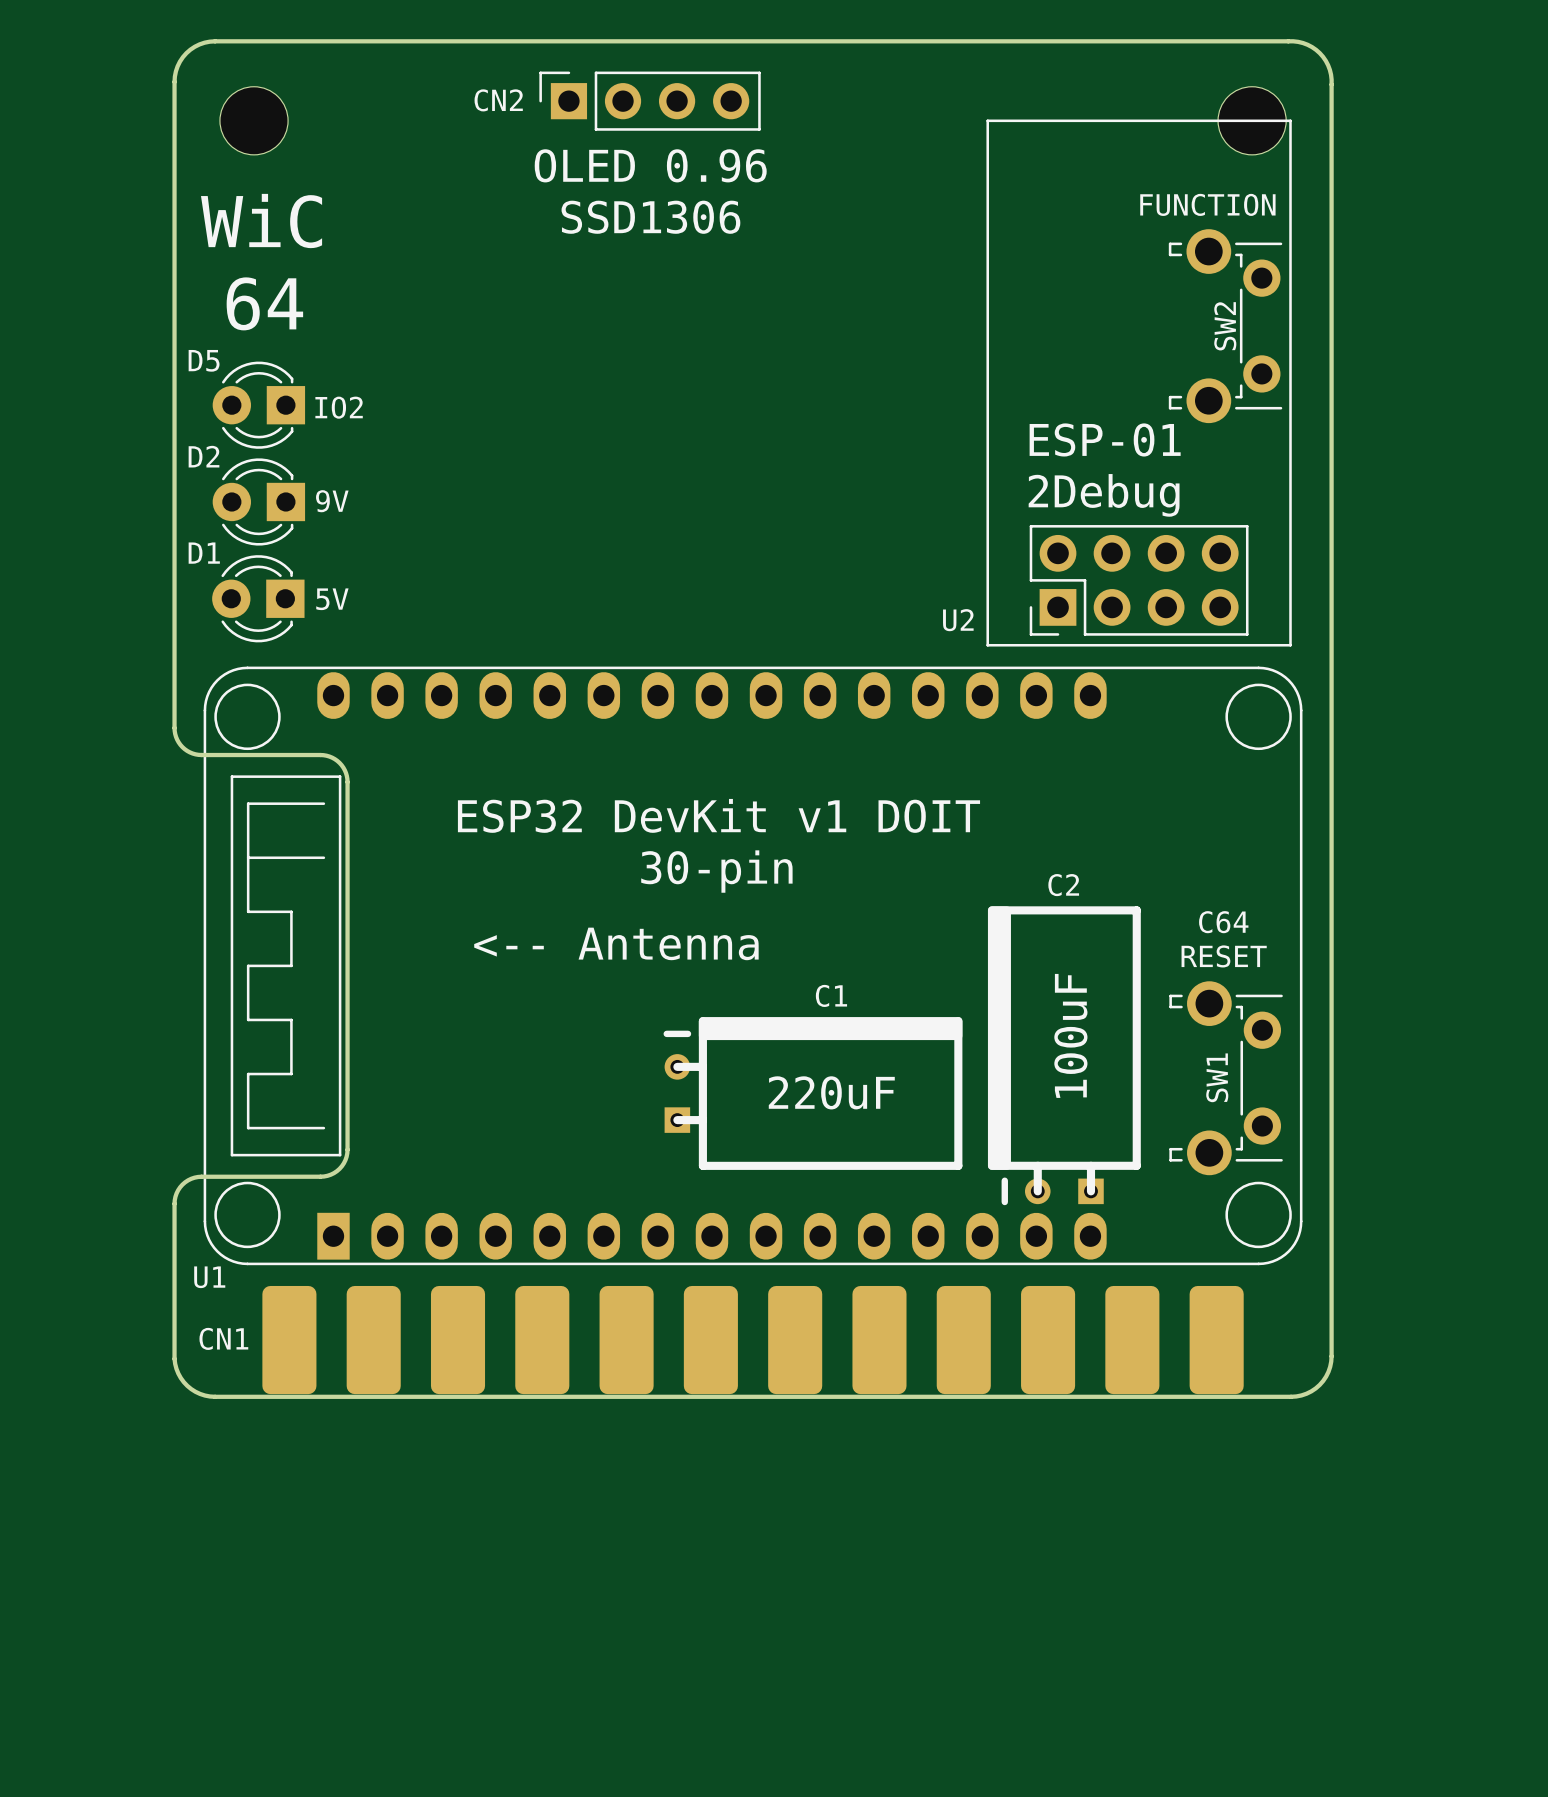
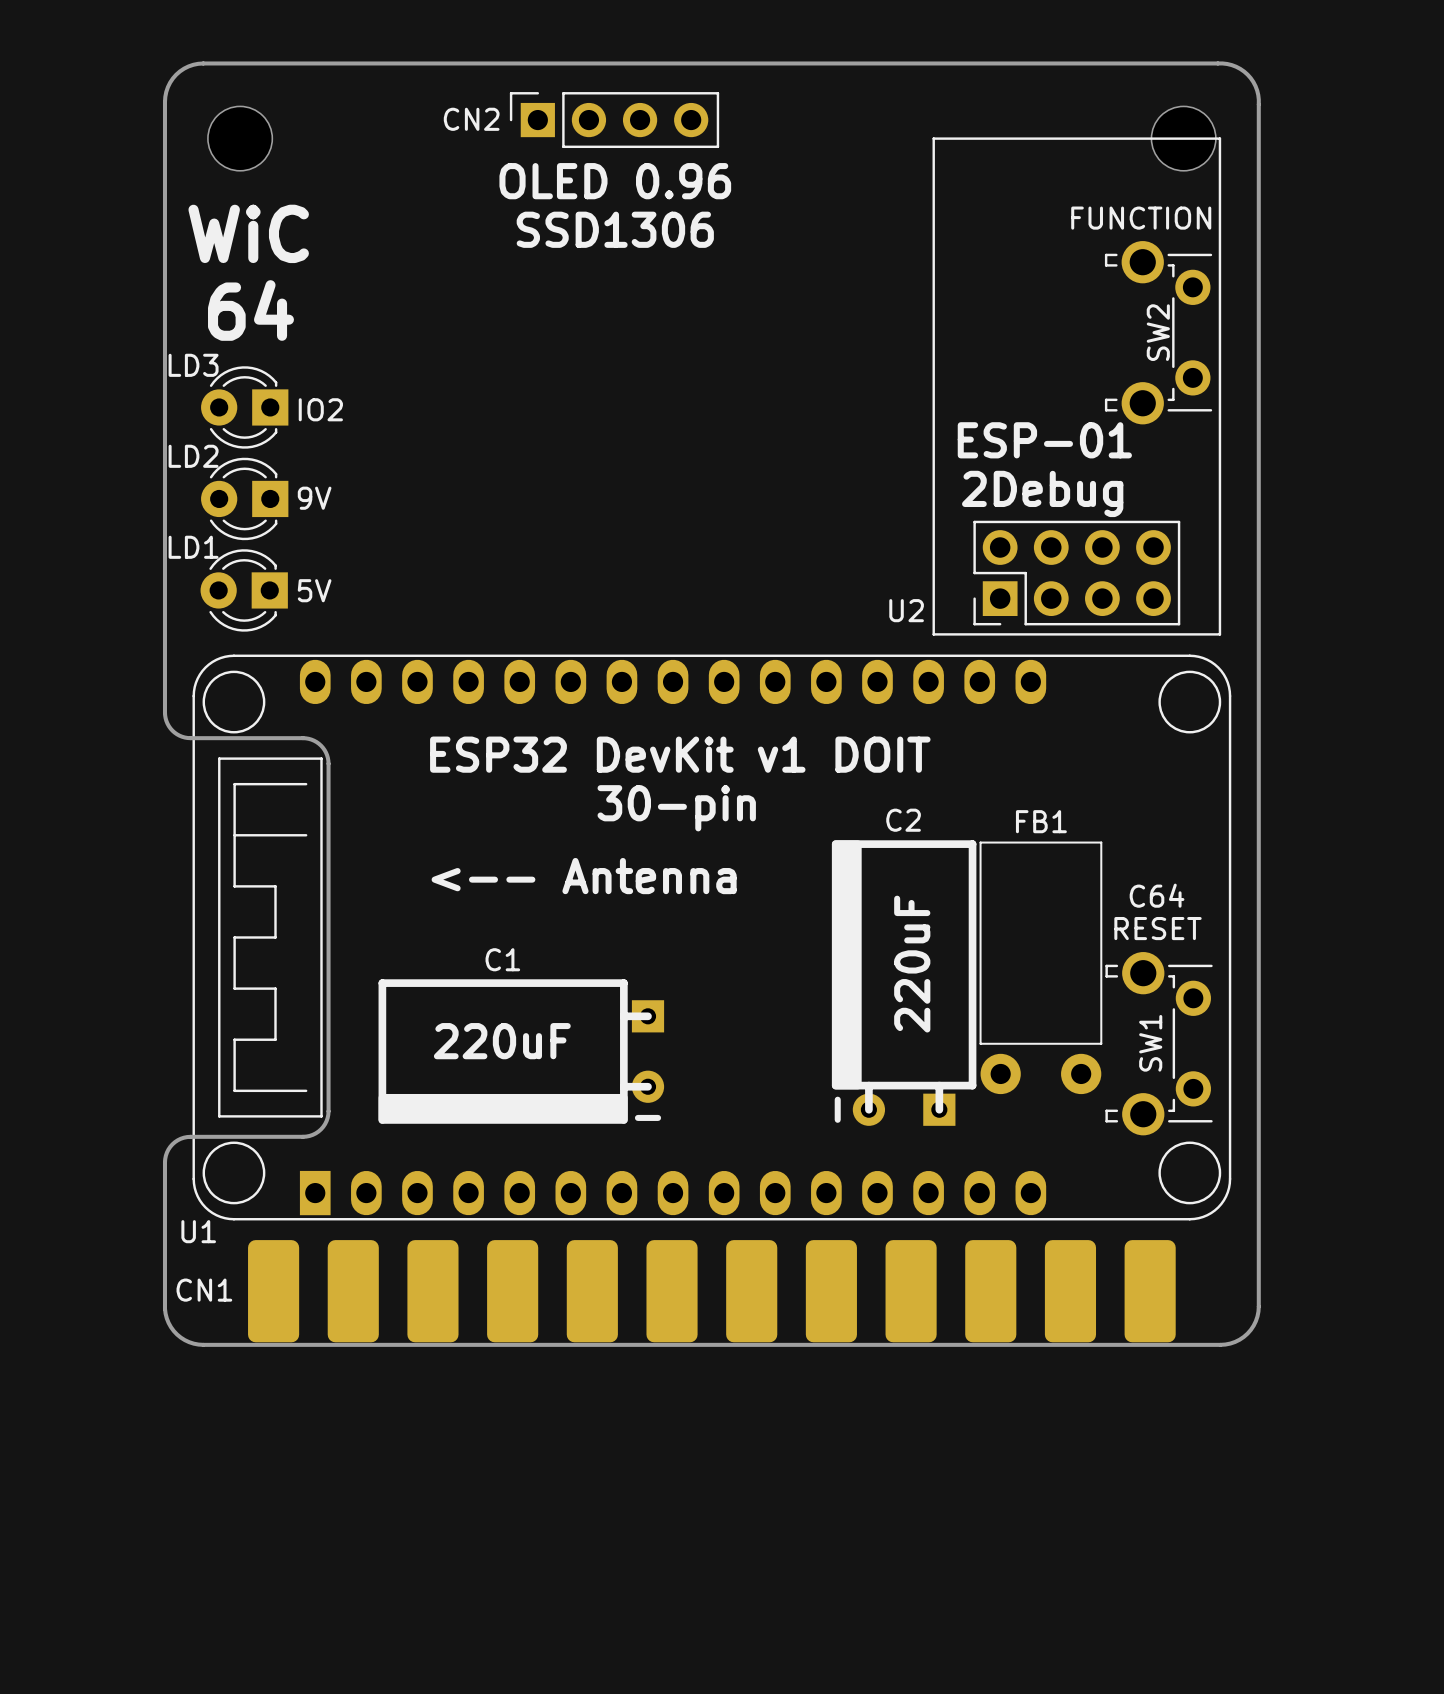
D5 name: D5 (204, 360) -> LD3 (193, 365)
D2 name: D2 (204, 456) -> LD2 (193, 456)
D1 name: D1 (204, 553) -> LD1 (193, 547)
text: none -> ESP32 DevKit v1 DOIT (680, 754)
text: ESP32 DevKit v1 DOIT (718, 815) -> 30-pin (676, 808)
text: 30-pin (716, 871) -> none
C2 footprint: [987, 906, 1141, 1206] -> [831, 840, 977, 1126]
text position: <-- Antenna (616, 943) -> <-- Antenna (584, 876)
FB1: none -> (1040, 967)
C1 footprint: [663, 1017, 963, 1170] -> [378, 979, 665, 1124]
C2 value: 100uF (1070, 1035) -> 220uF (912, 964)

